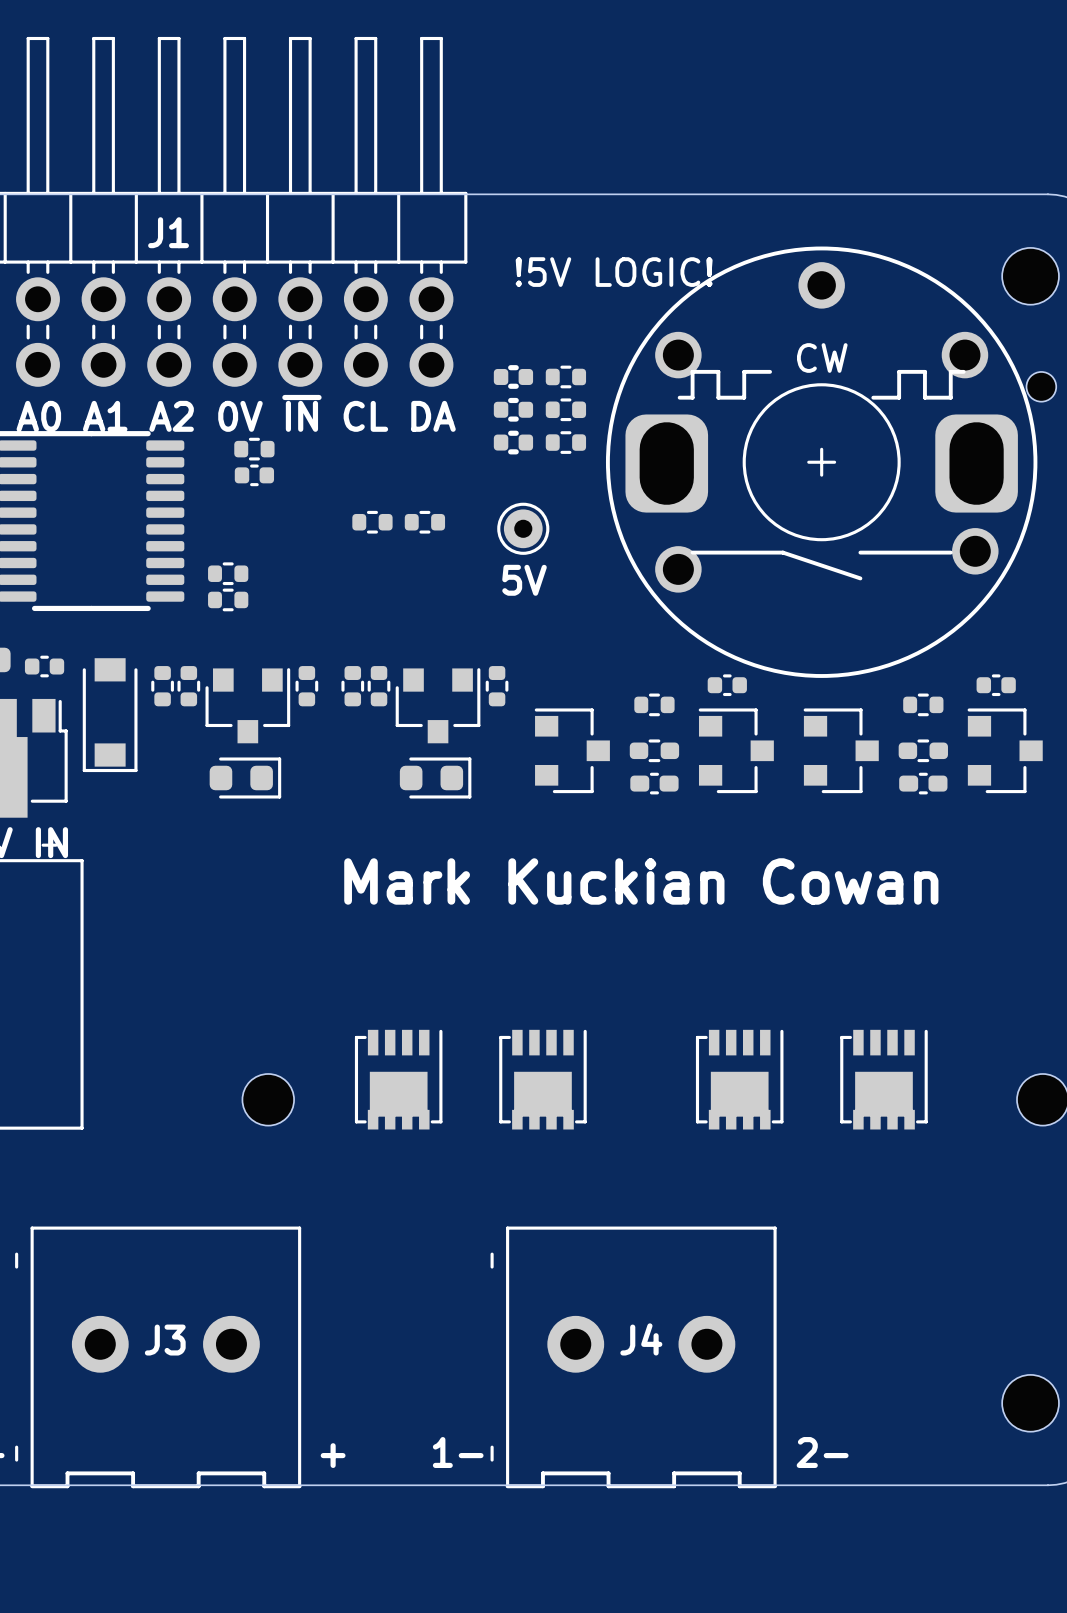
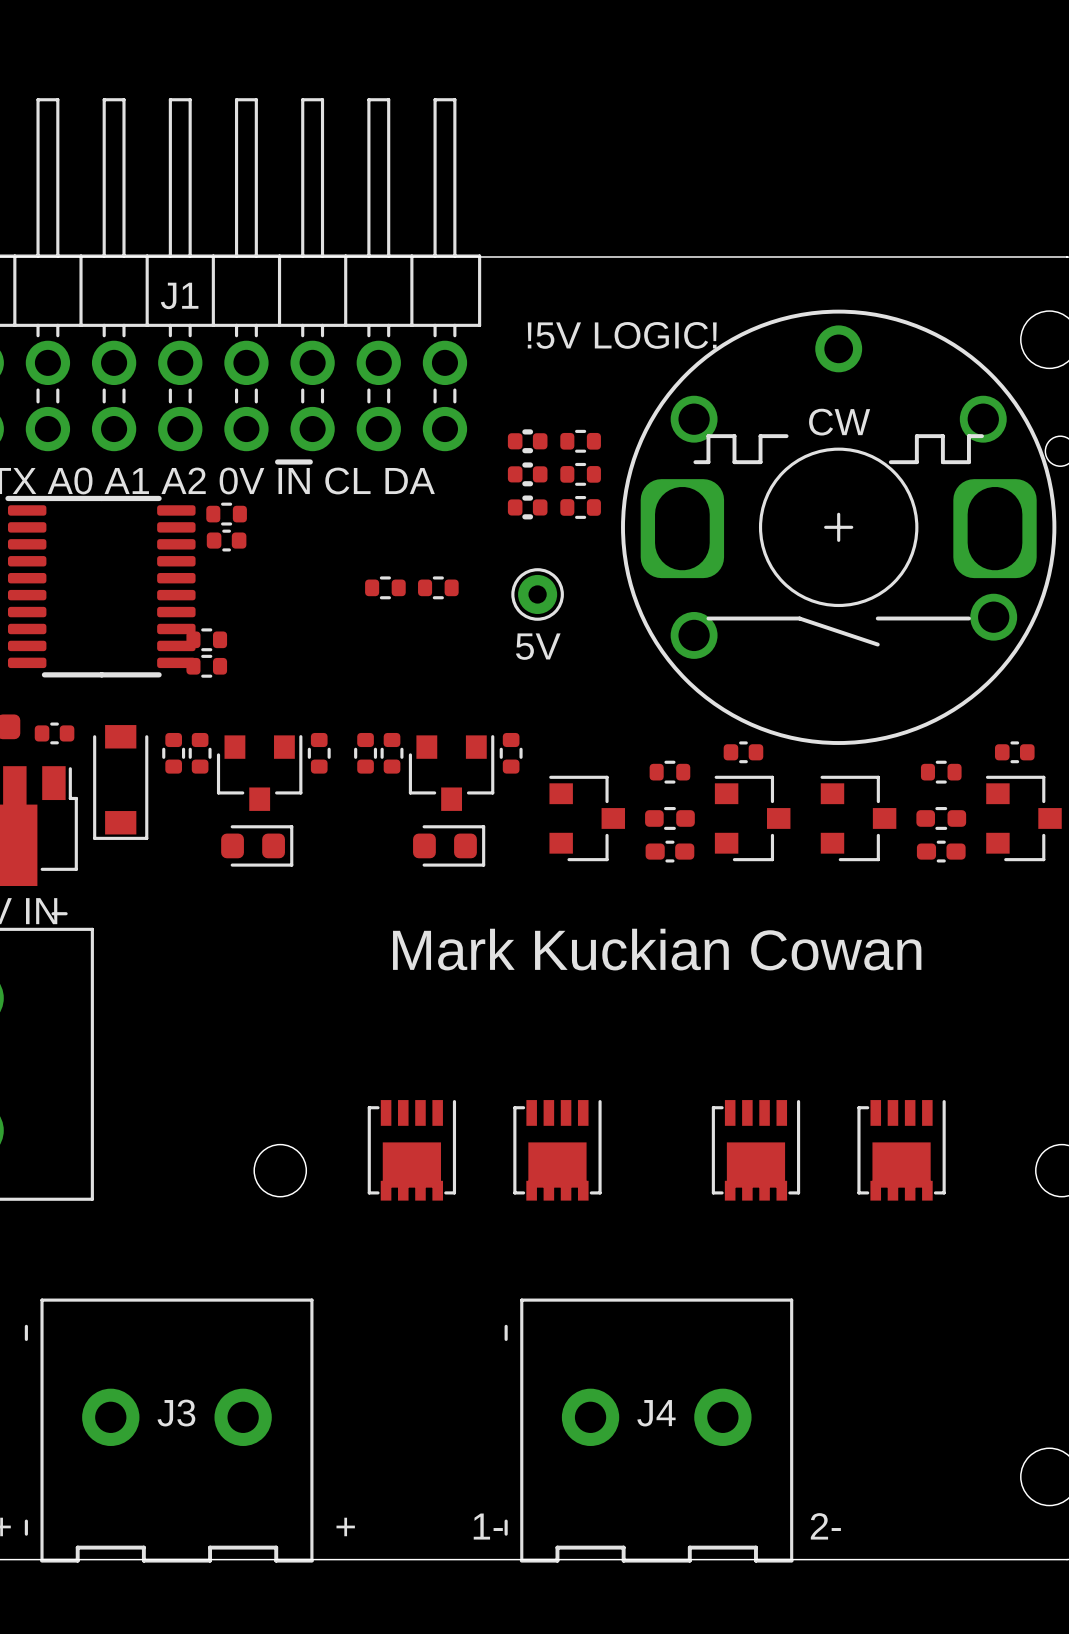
part position: (254, 449) -> (226, 514)
part position: (254, 475) -> (226, 540)
part: none -> (206, 639)
part: (228, 573) -> none
part: none -> (206, 666)
part: (228, 599) -> none

